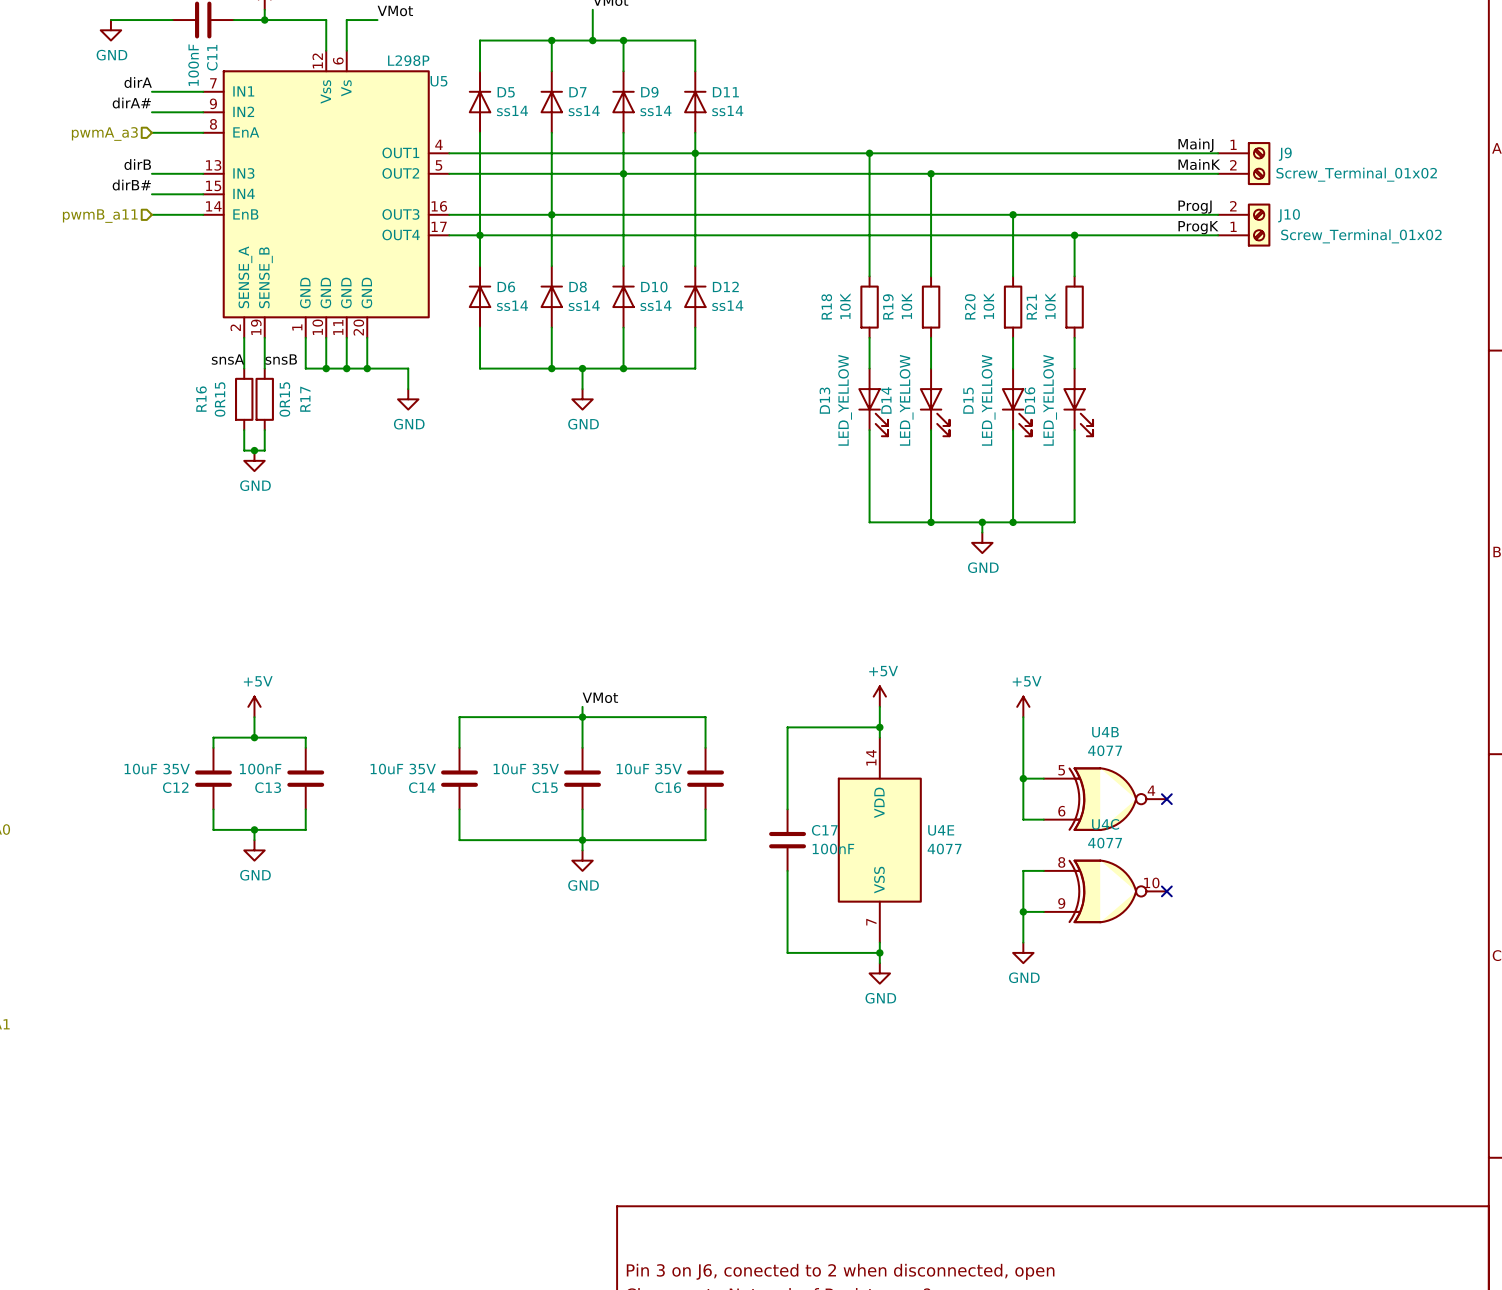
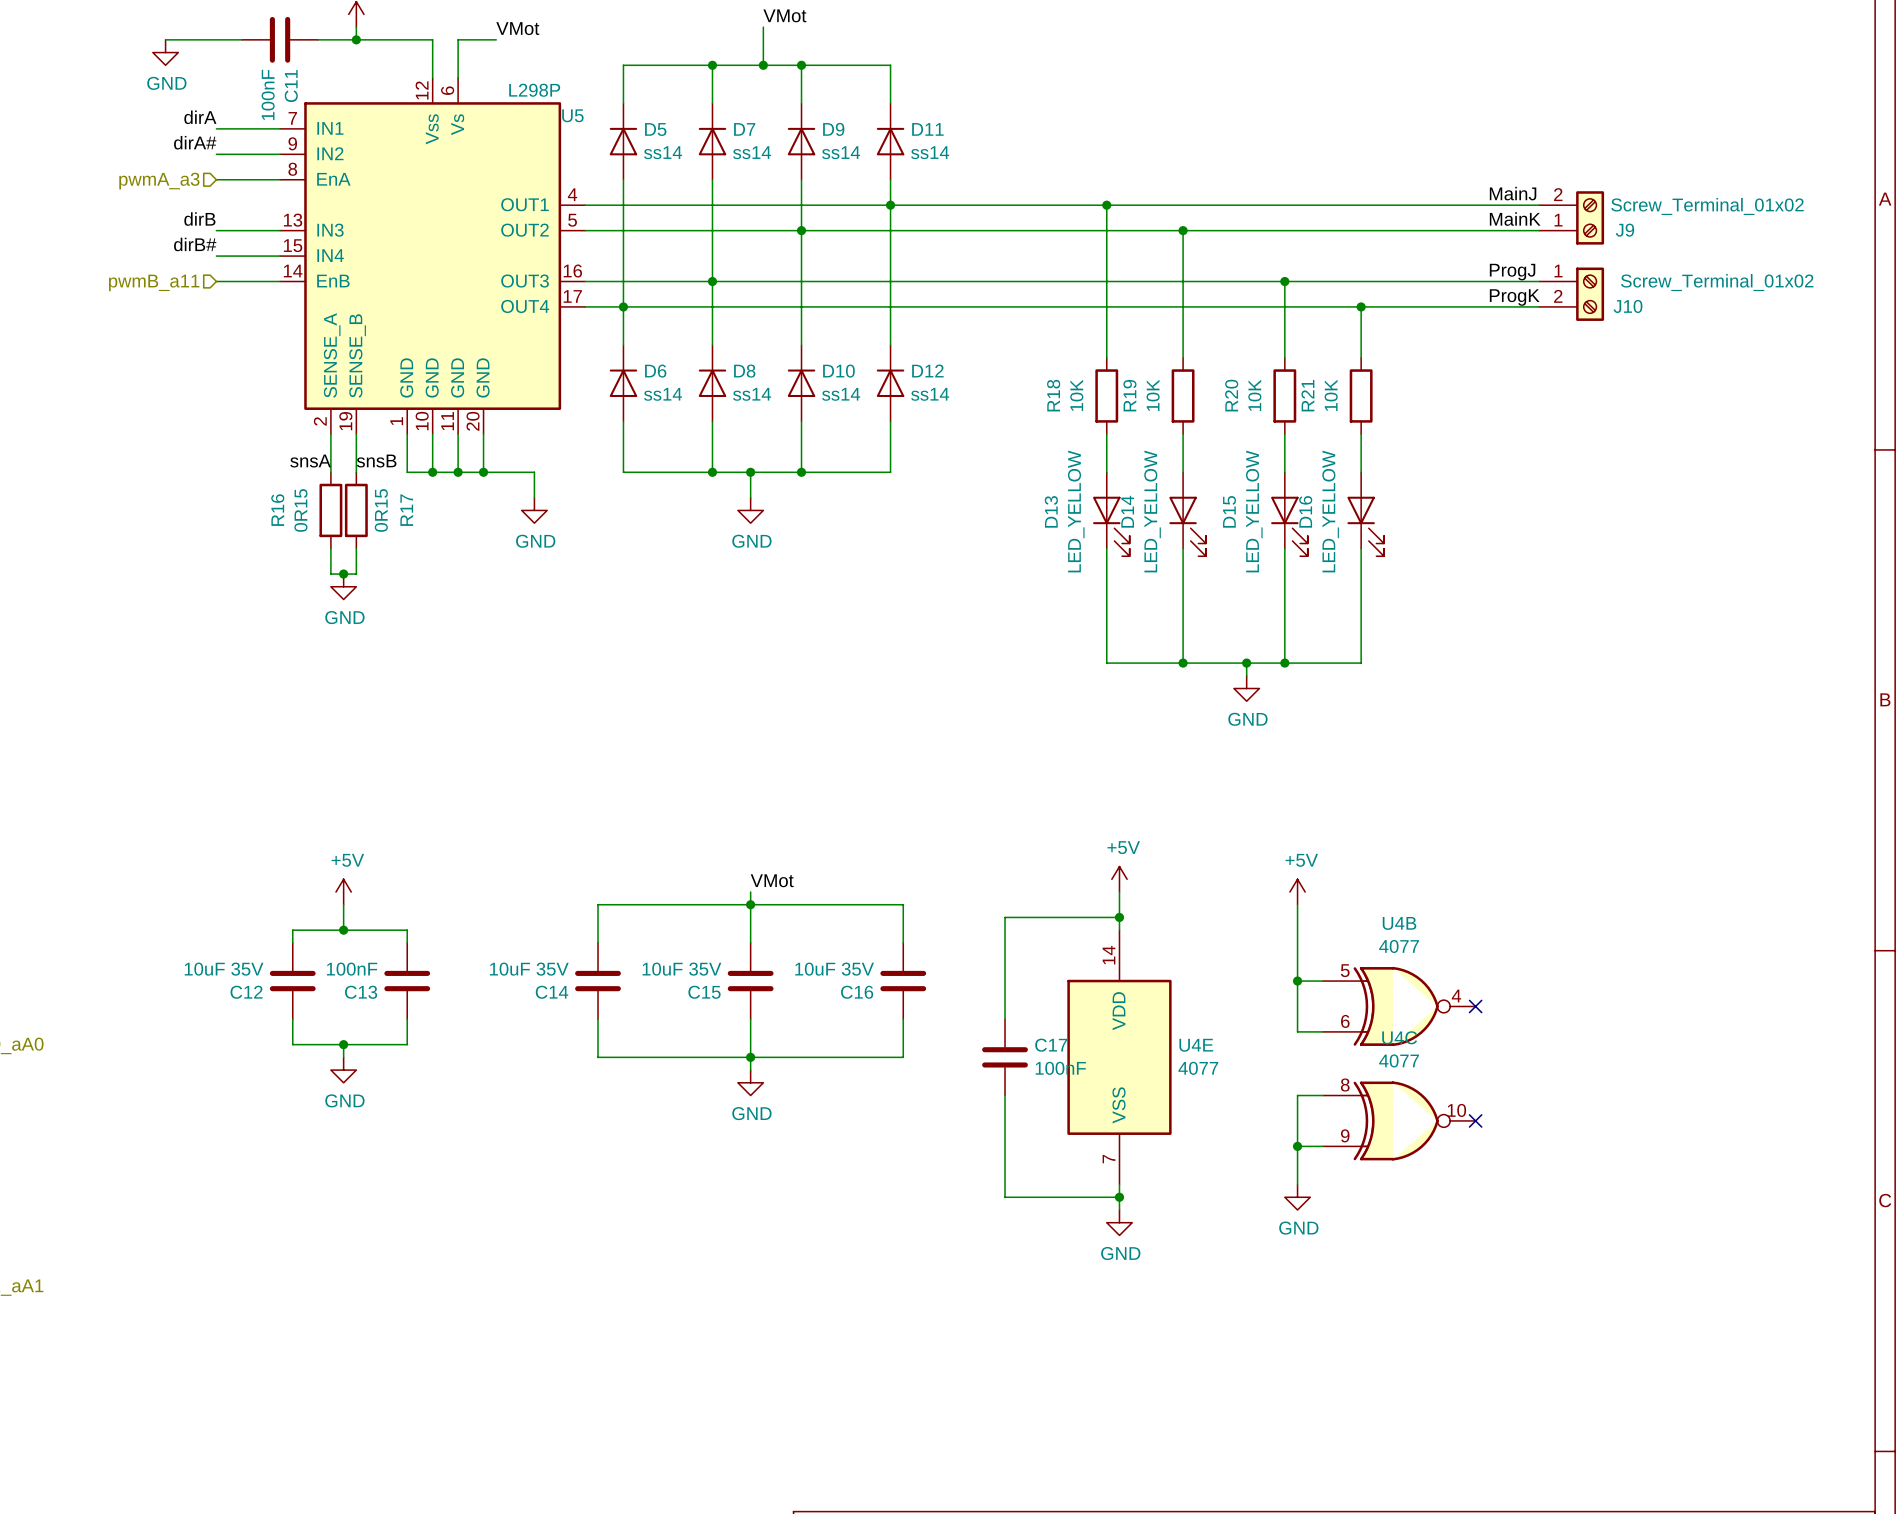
J9 flip: as is (1259, 163) -> up-down (1590, 217)
J10 flip: as is (1259, 225) -> up-down (1590, 294)

